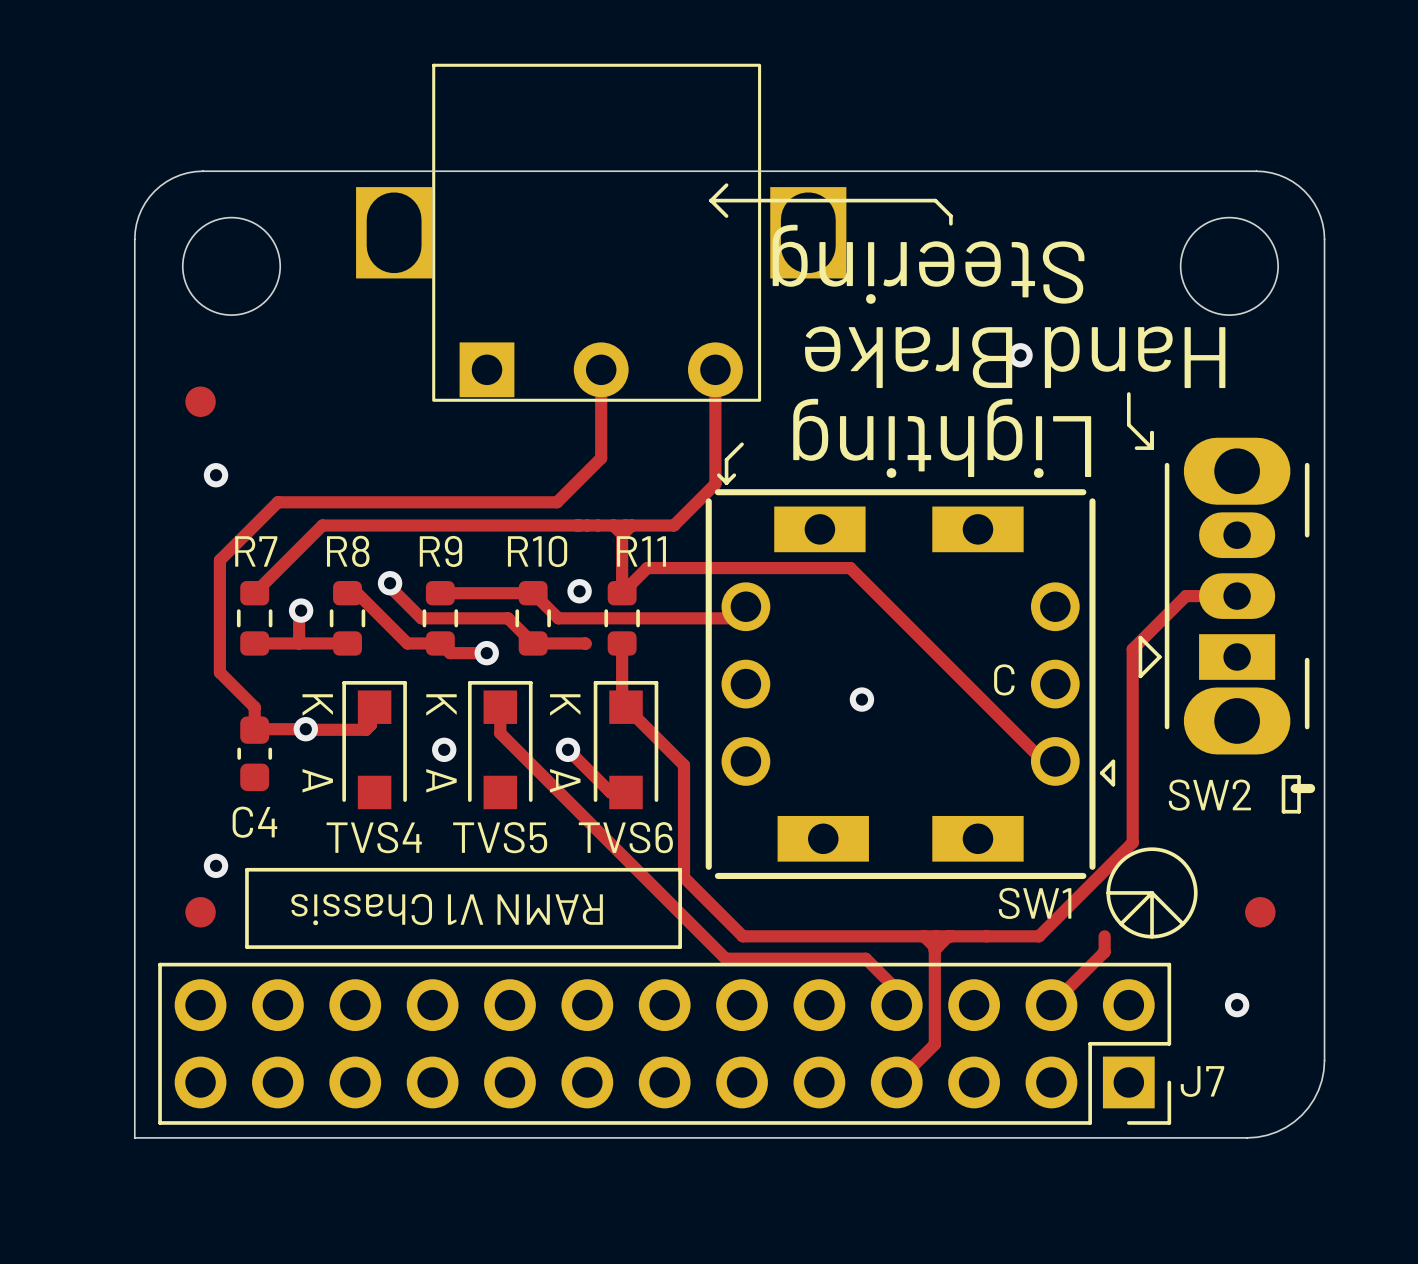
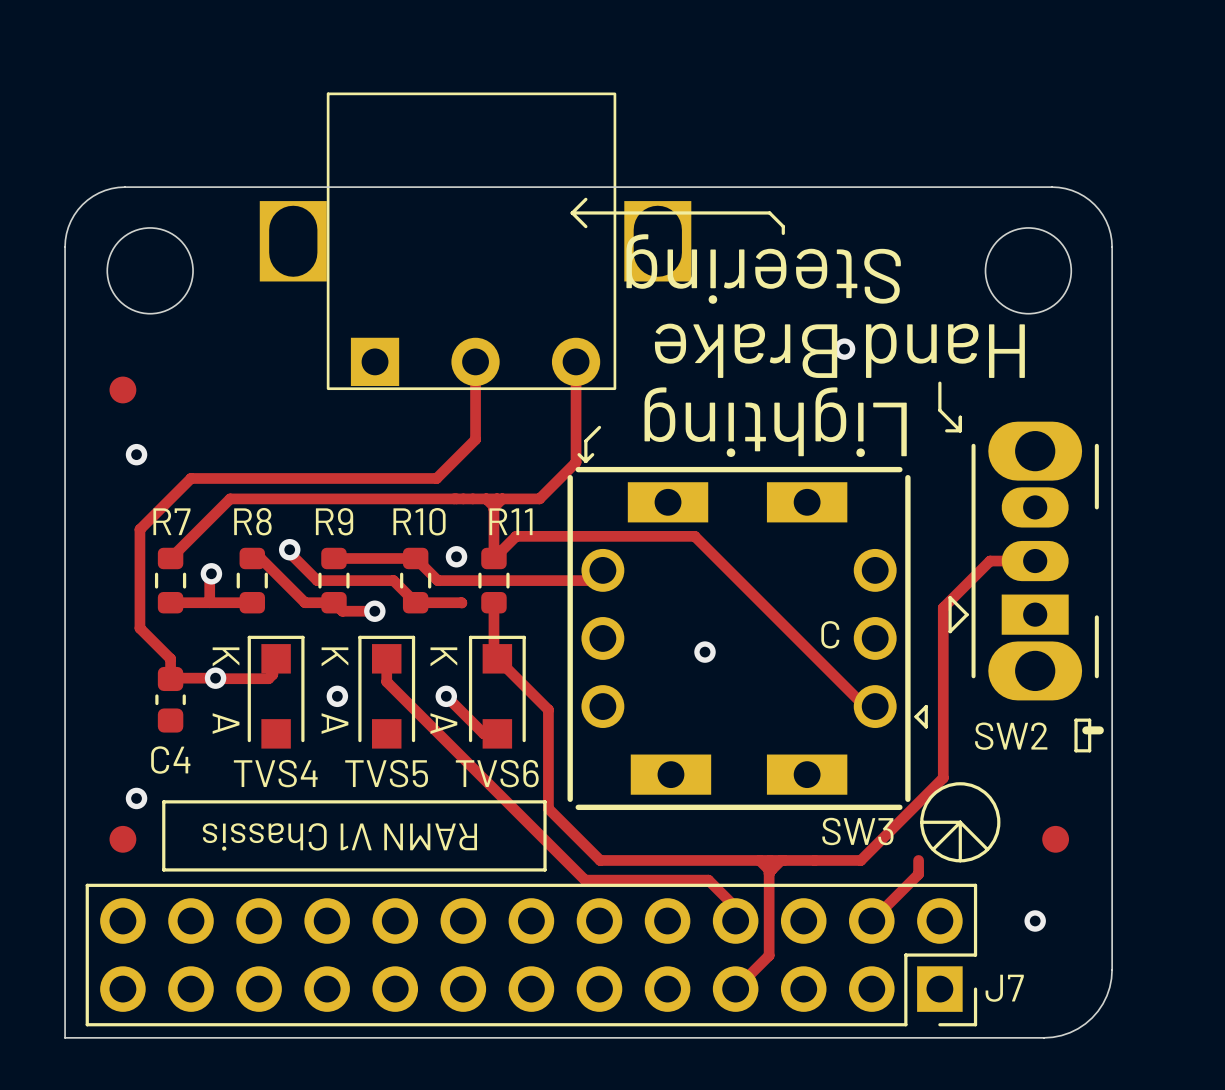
SW1 name: SW1 (1035, 903) -> SW3 (857, 831)

